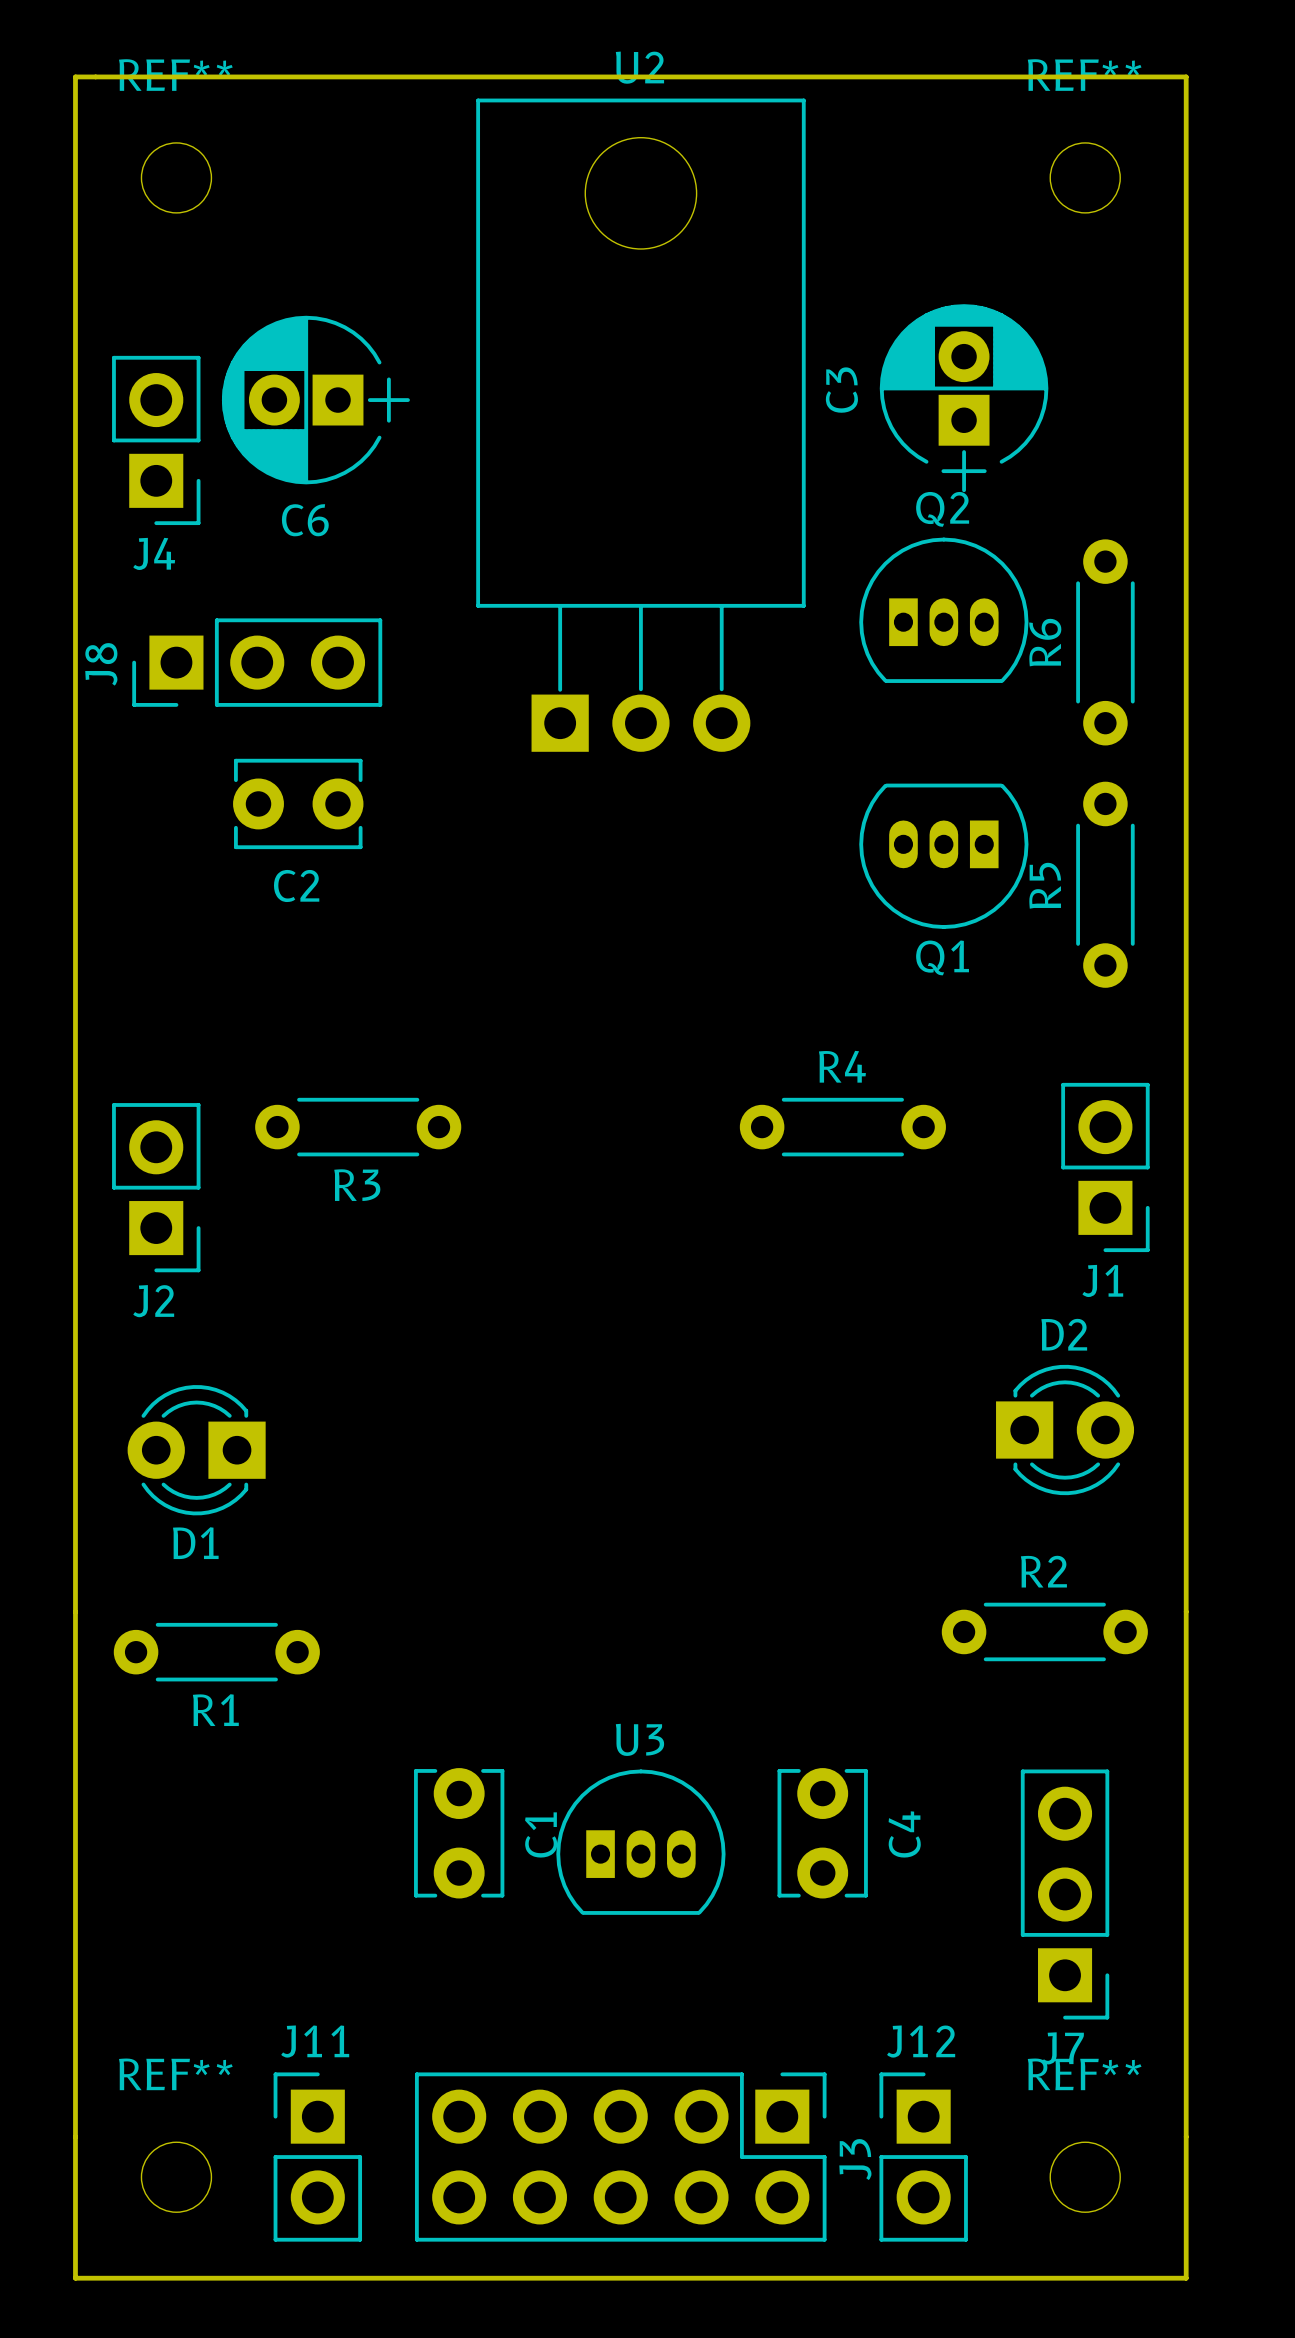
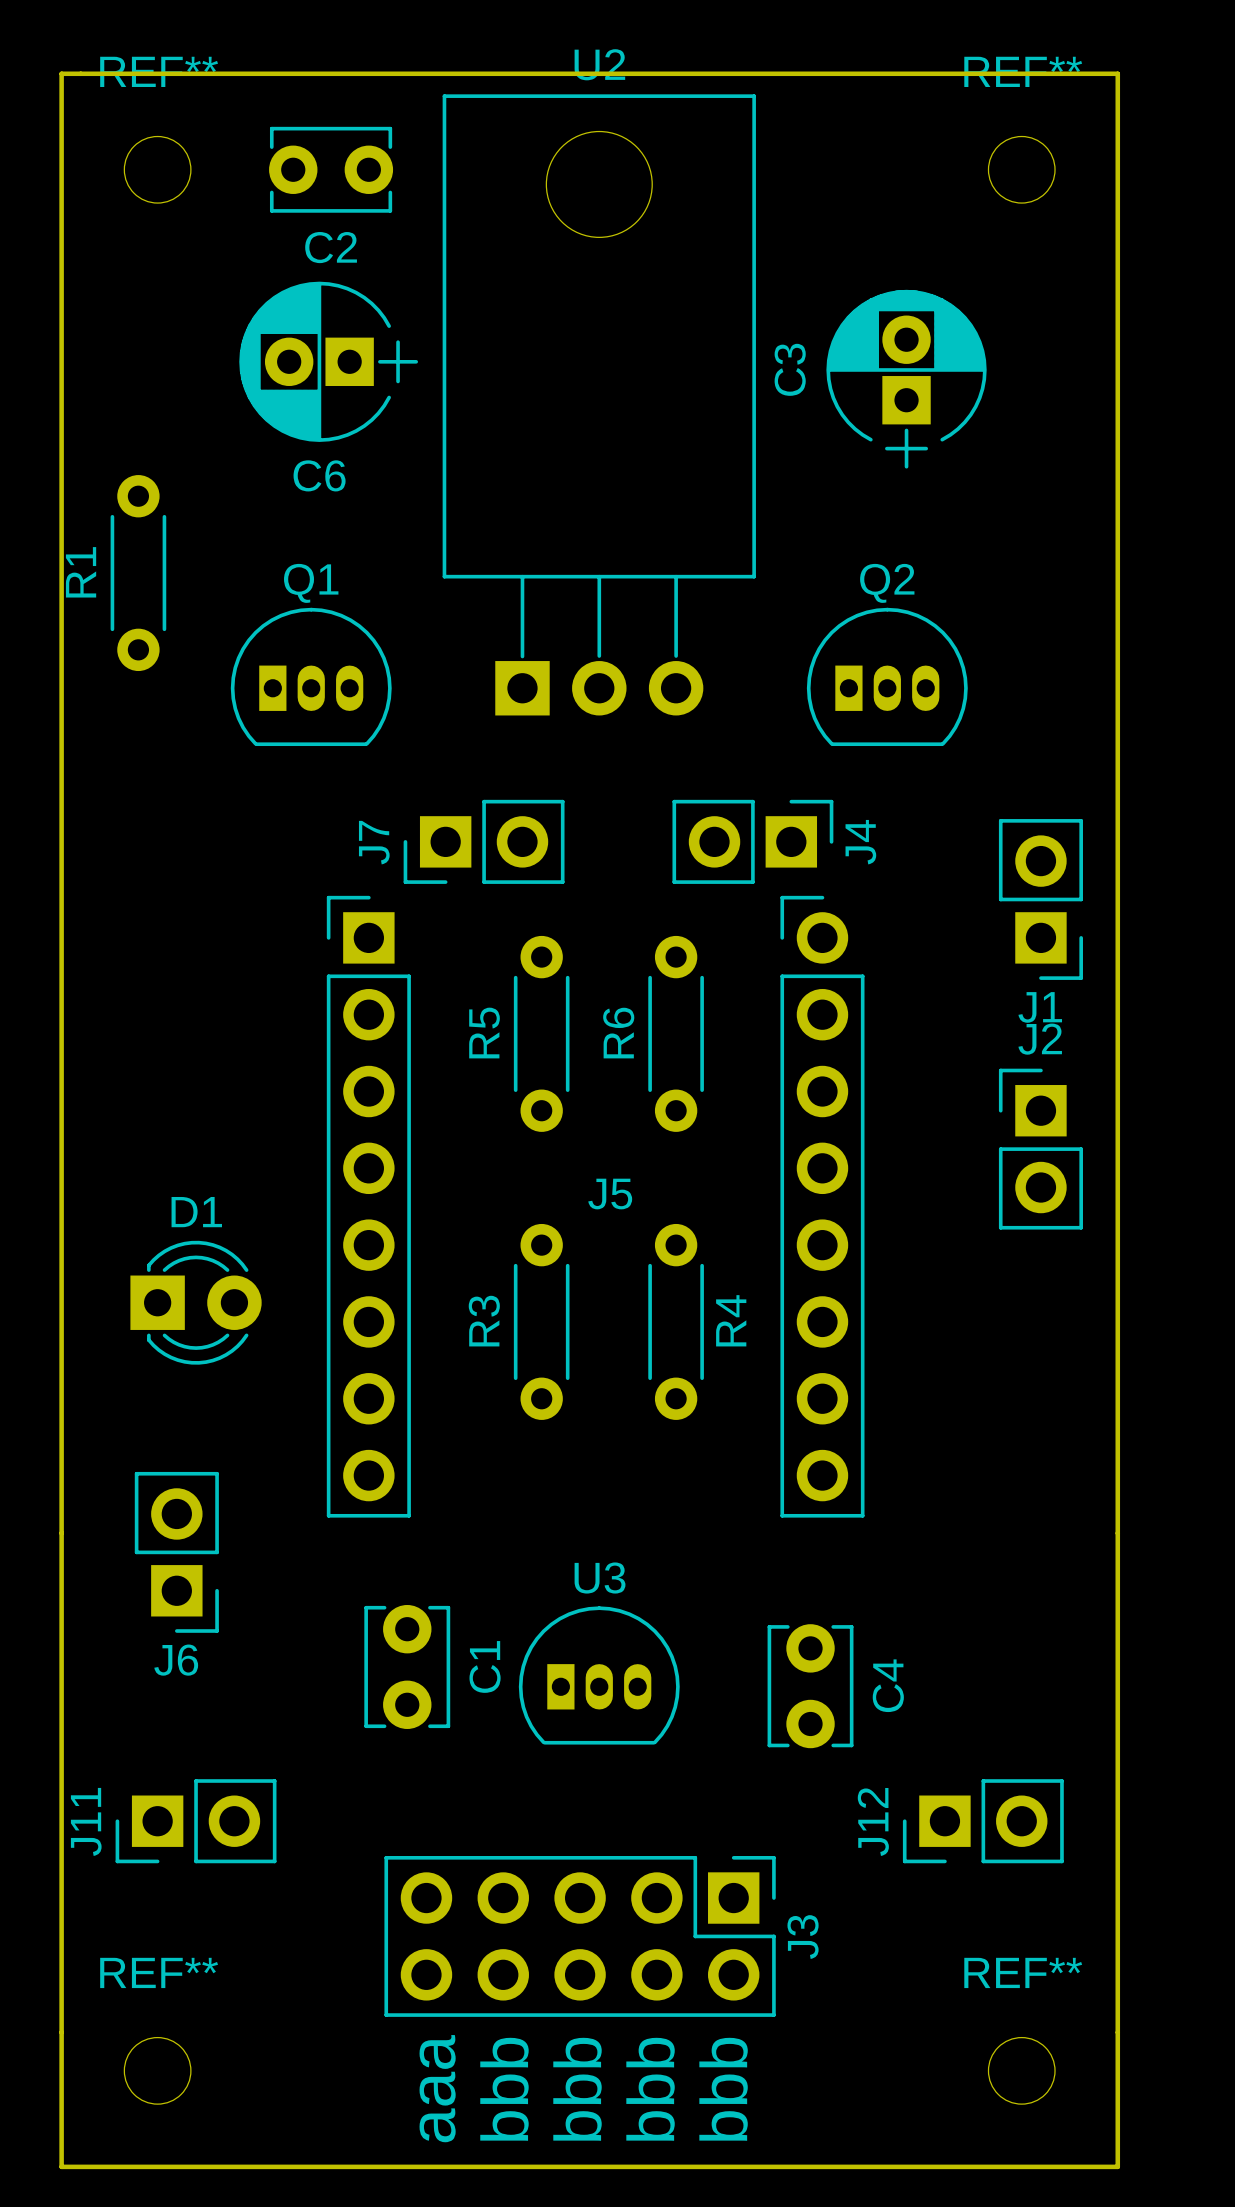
C6 position: (315, 400) -> (328, 361)
J4 rotation: 0° (156, 440) -> 90° counterclockwise (752, 841)
J4 position: (156, 440) -> (752, 841)
Q2 position: (943, 610) -> (887, 676)
R6 position: (1105, 642) -> (676, 1033)
J8: (257, 662) -> none
C2 position: (298, 803) -> (331, 169)
Q1 rotation: 0° (943, 856) -> 180° (311, 676)
Q1 position: (943, 856) -> (311, 676)
R5 position: (1105, 884) -> (541, 1033)
R3 rotation: 0° (358, 1127) -> 90° clockwise (541, 1321)
R3 position: (358, 1127) -> (541, 1321)
R4 rotation: 0° (842, 1127) -> 90° clockwise (676, 1321)
R4 position: (842, 1127) -> (676, 1321)
J1 position: (1105, 1167) -> (1040, 899)
J2 rotation: 0° (156, 1187) -> 180° (1040, 1149)
J2 position: (156, 1187) -> (1040, 1149)
J5: none -> (595, 1206)
D2: (1065, 1430) -> none
D1 rotation: 0° (196, 1450) -> 180° (196, 1302)
D1 position: (196, 1450) -> (196, 1302)
J6: none -> (176, 1552)
R2: (1044, 1631) -> none
R1 rotation: 0° (216, 1652) -> 90° clockwise (138, 573)
R1 position: (216, 1652) -> (138, 573)
J7 footprint: [1020, 1769, 1110, 2020] -> [403, 799, 565, 884]
C1 position: (459, 1833) -> (407, 1666)
C4 position: (822, 1833) -> (810, 1686)
U3 position: (640, 1842) -> (599, 1675)
J7 name position: J7 (1062, 2048) -> J7 (374, 842)
J11 rotation: 0° (317, 2157) -> 90° counterclockwise (196, 1821)
J11 position: (317, 2157) -> (196, 1821)
J3 position: (620, 2157) -> (580, 1936)
J12 rotation: 0° (923, 2157) -> 90° counterclockwise (983, 1821)
J12 position: (923, 2157) -> (983, 1821)
text: none -> bbb (504, 2089)
text: none -> bbb (577, 2089)
text: none -> bbb (650, 2089)
text: none -> bbb (723, 2089)
text: none -> aaa (437, 2088)

